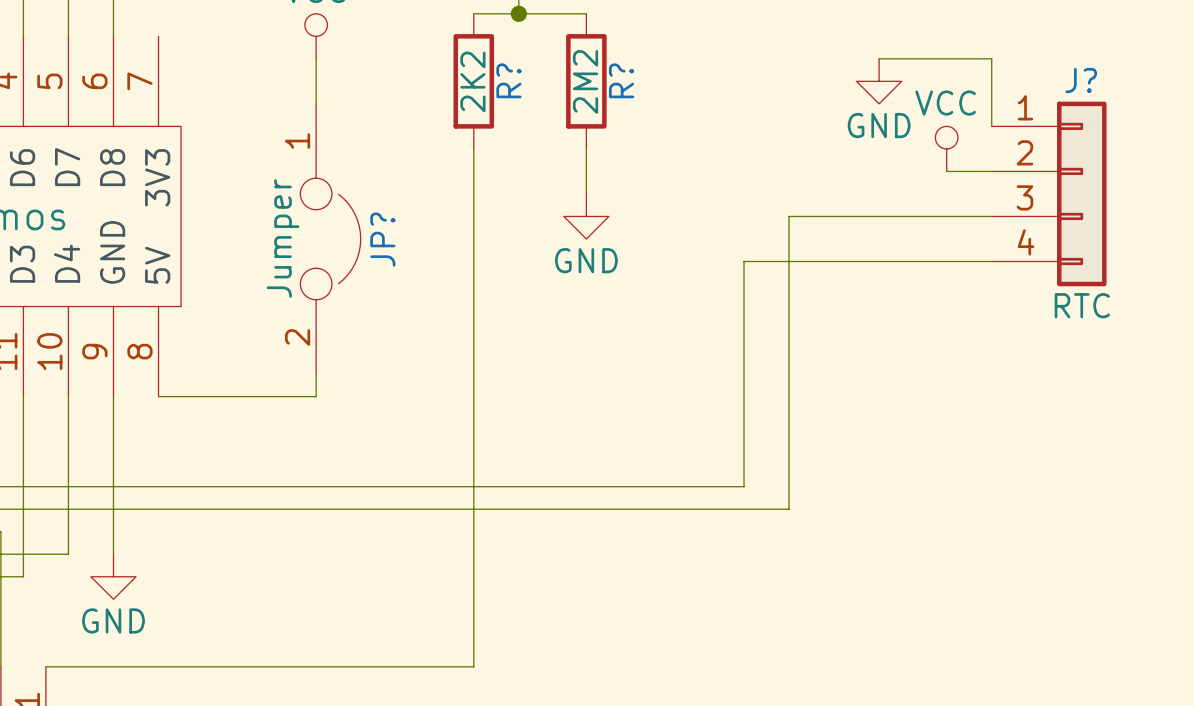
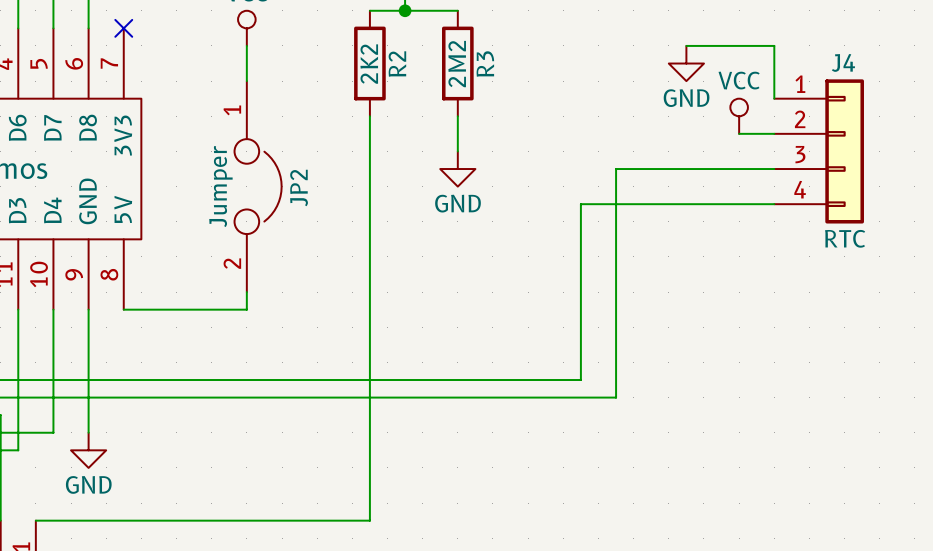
no-connect mark: none -> (123, 28)
R? name: R? (508, 80) -> R2 (397, 64)
R? name: R? (621, 80) -> R3 (485, 64)
J? name: J? (1081, 80) -> J4 (843, 62)
JP? name: JP? (382, 239) -> JP2 (299, 188)

